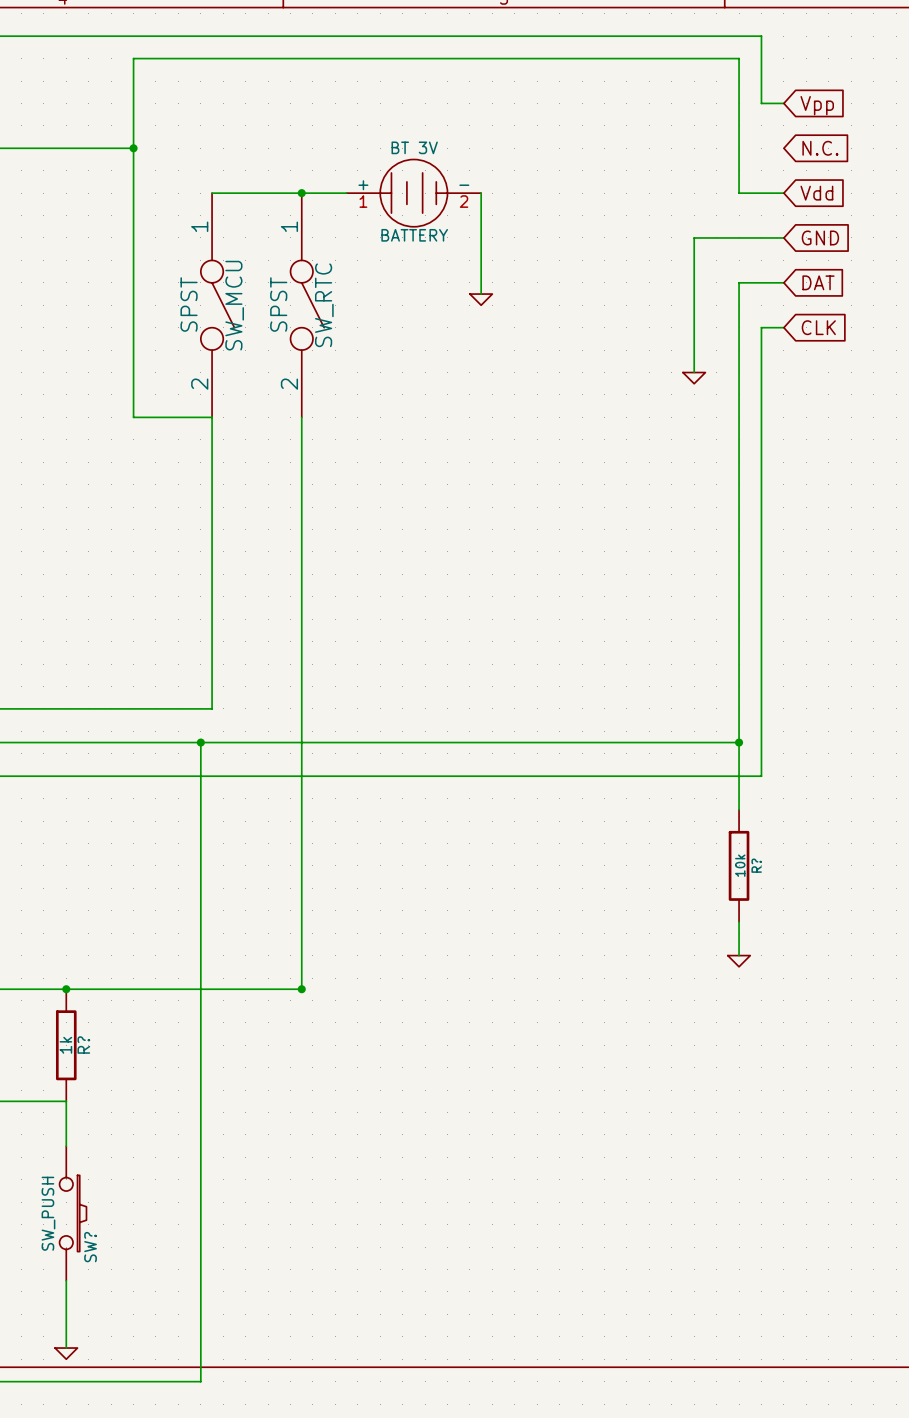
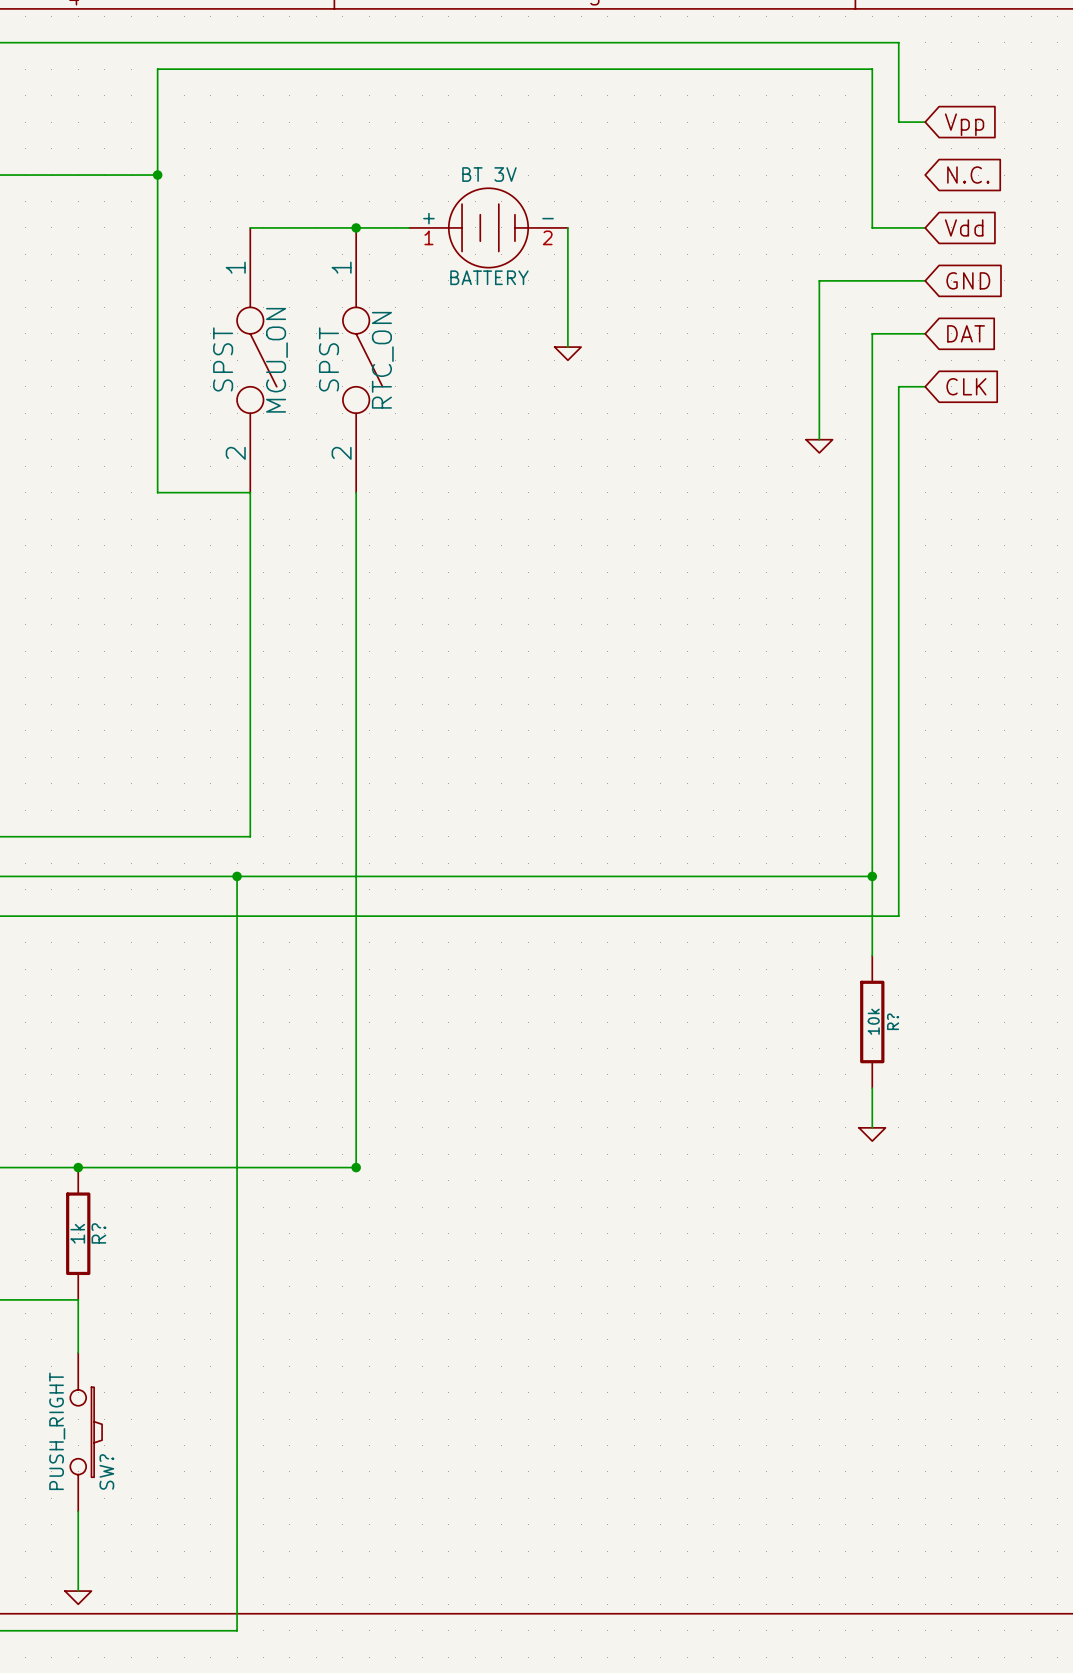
SW_MCU name: SW_MCU (234, 305) -> MCU_ON (276, 360)
SW_RTC name: SW_RTC (324, 305) -> RTC_ON (382, 360)
SW? value: SW_PUSH (48, 1213) -> PUSH_RIGHT (57, 1431)

